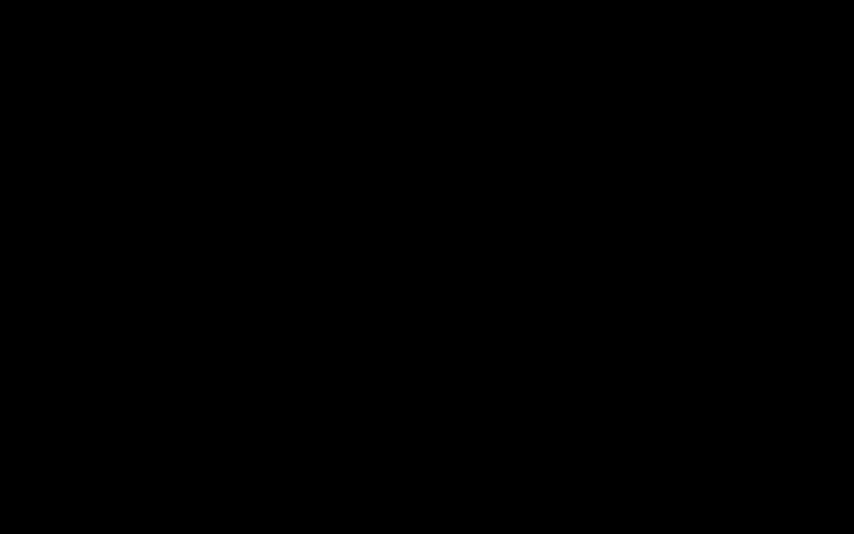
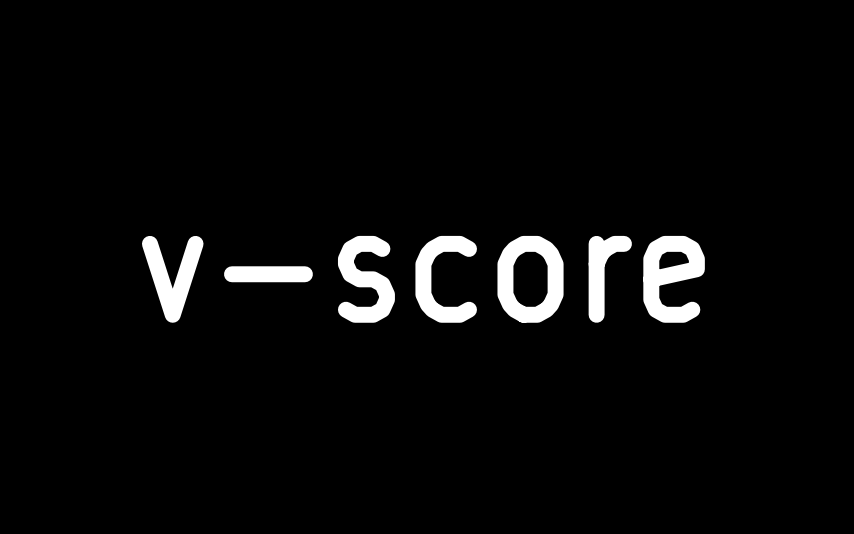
text: none -> v-score (423, 279)

